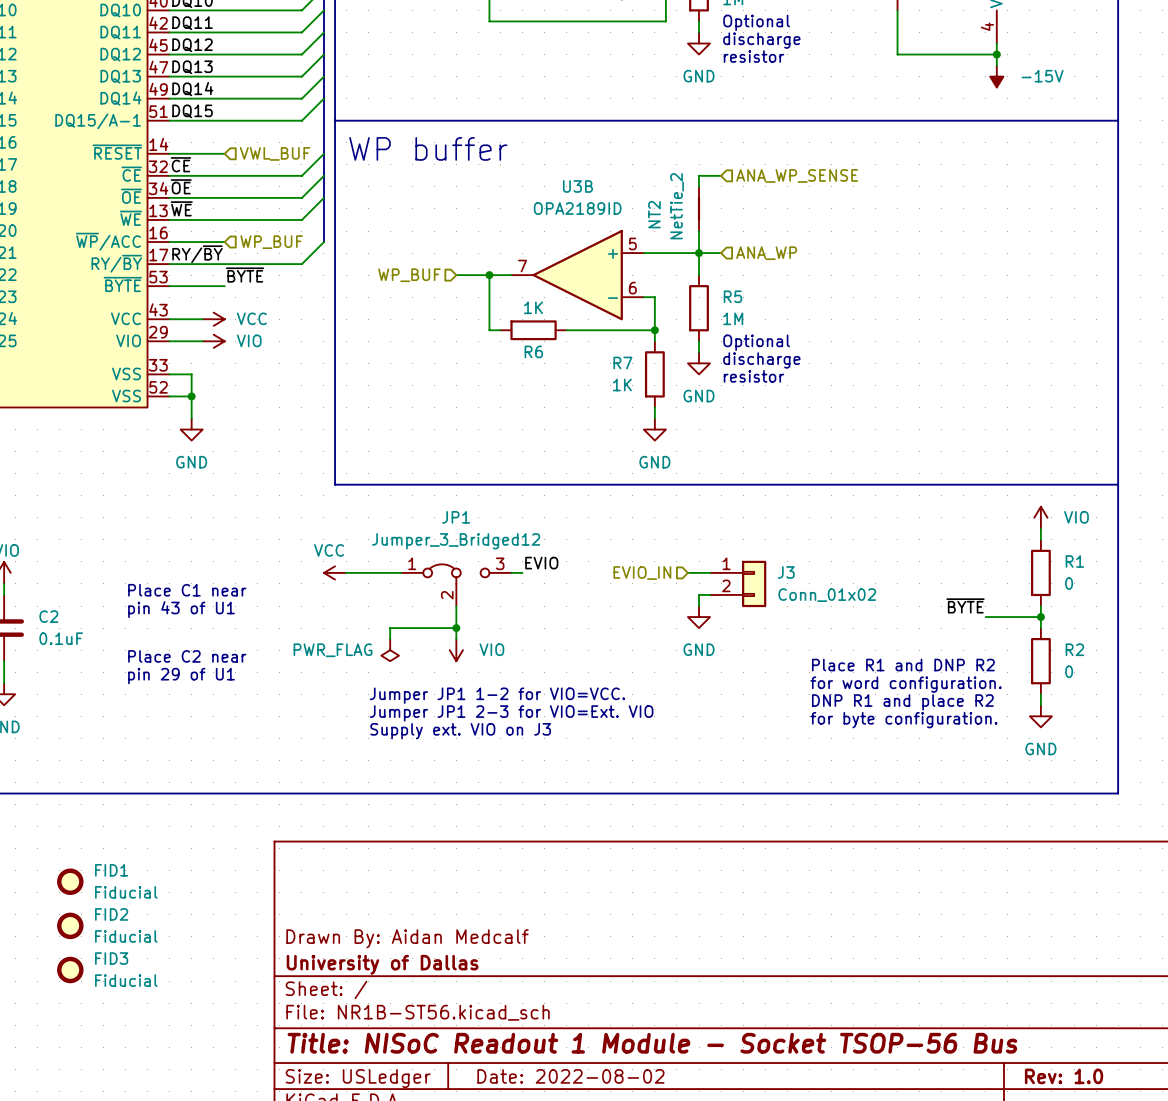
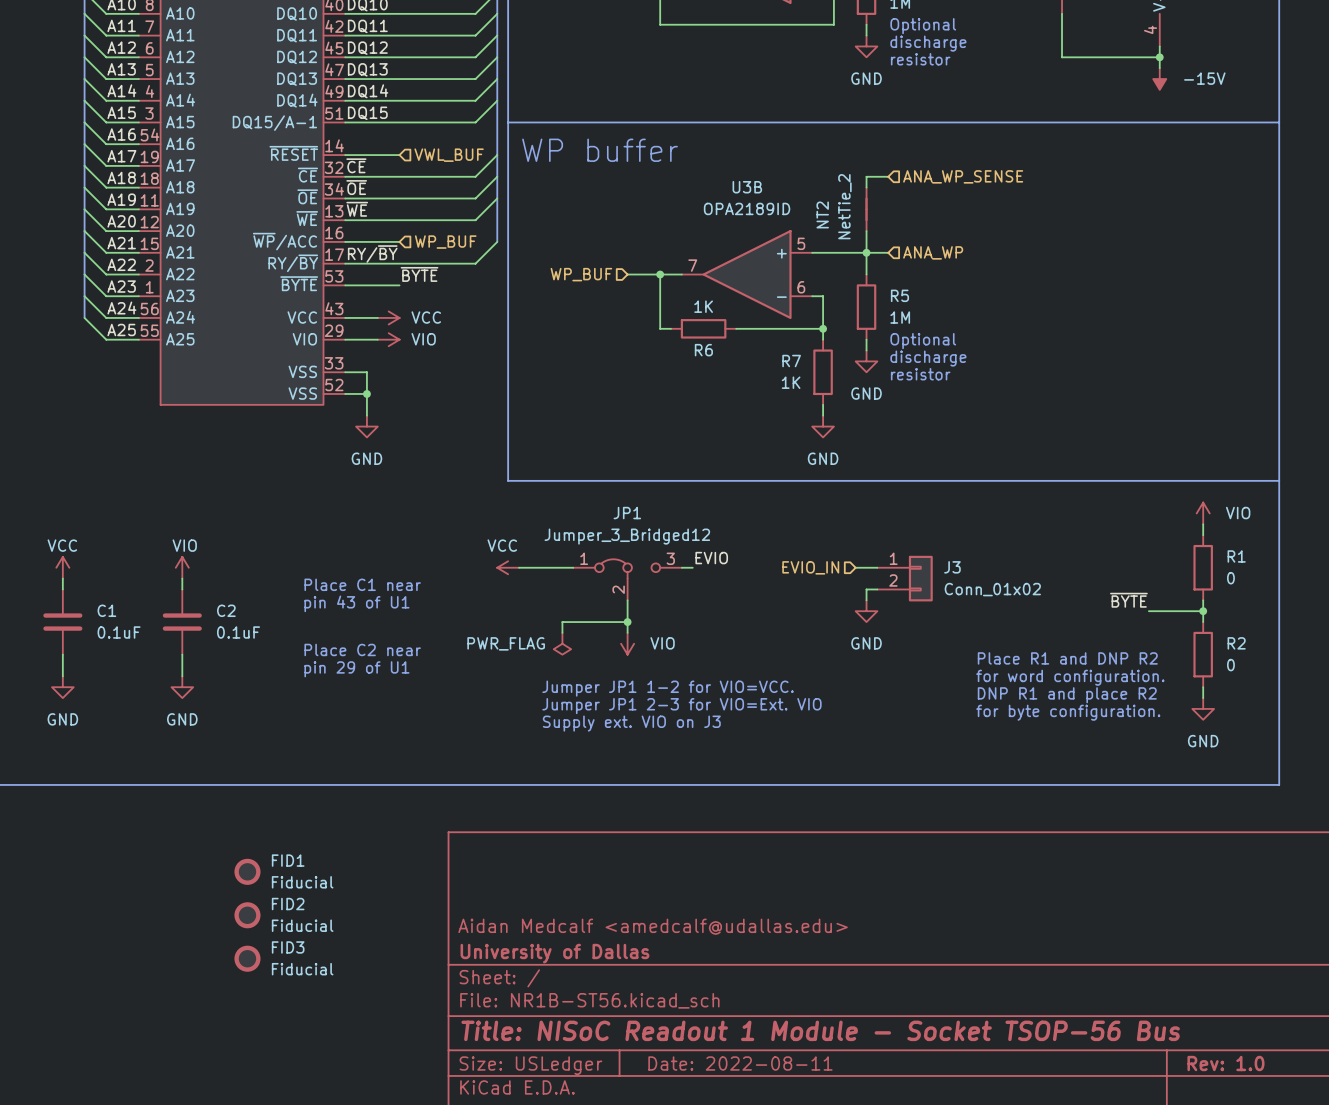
title block: Drawn By: Aidan Medcalf (407, 938) -> Aidan Medcalf <amedcalf@udallas.edu> (653, 926)
title block: Date: 2022-08-02 (570, 1076) -> Date: 2022-08-11 (740, 1063)

